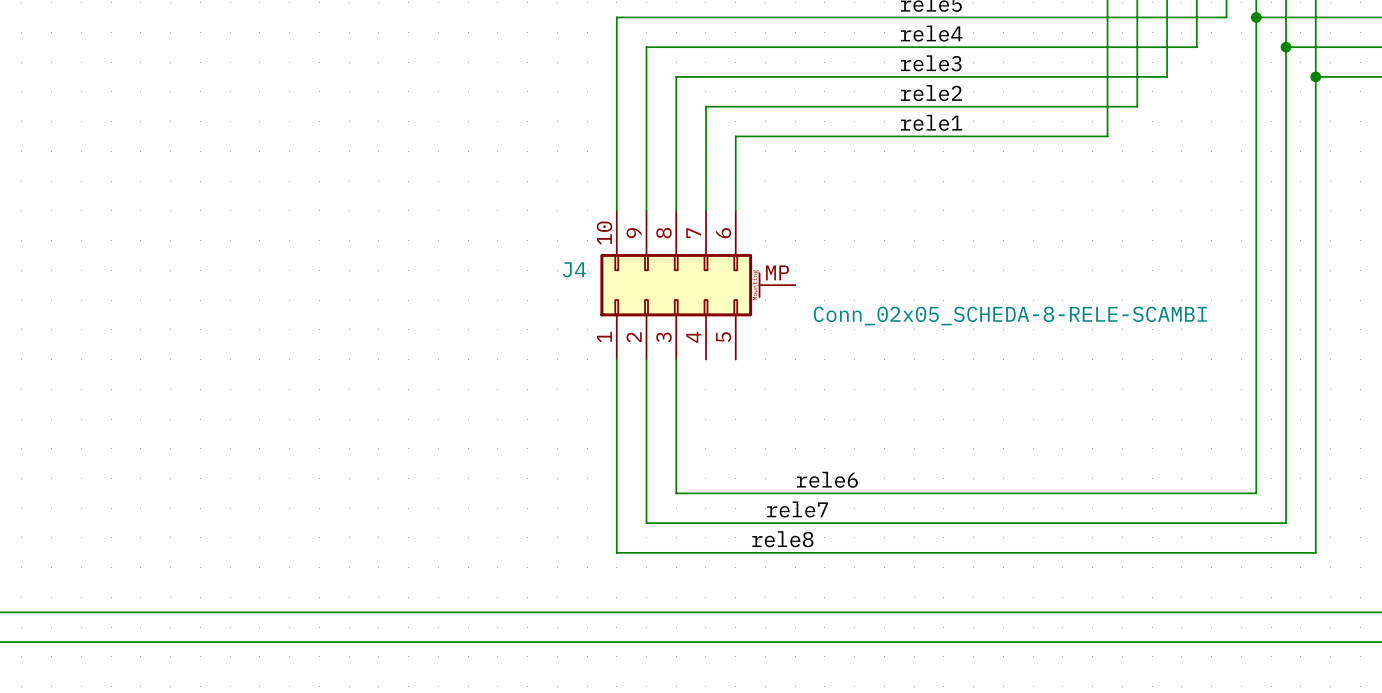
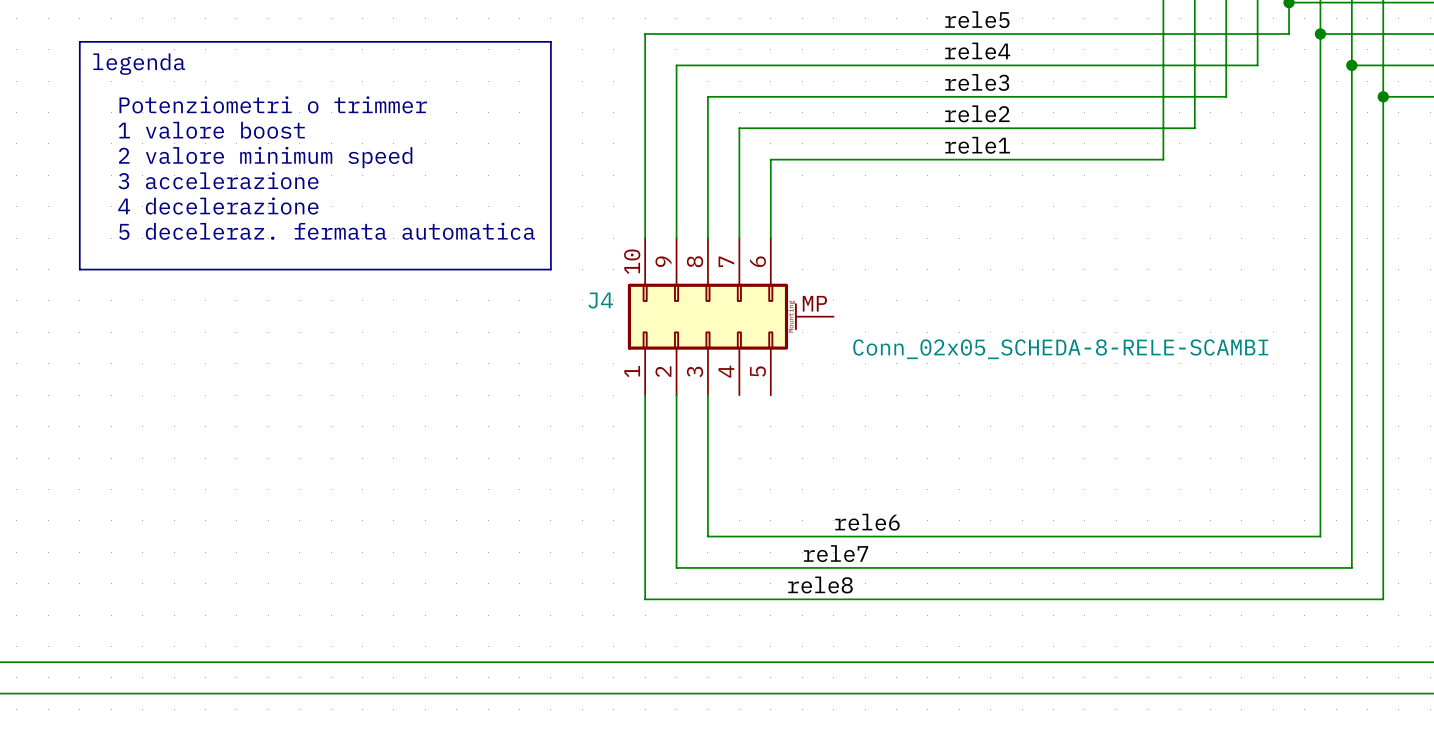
line: none -> (79, 41) (550, 41) (550, 269) (79, 269) (79, 41)
text: none -> legenda (139, 64)
text: none -> Potenziometri o trimmer (273, 104)
text: none -> 1 valore boost (211, 130)
text: none -> 2 valore minimum speed (265, 157)
text: none -> 3 accelerazione (218, 180)
text: none -> 4 decelerazione (218, 206)
text: none -> 5 deceleraz. fermata automatica (326, 231)

